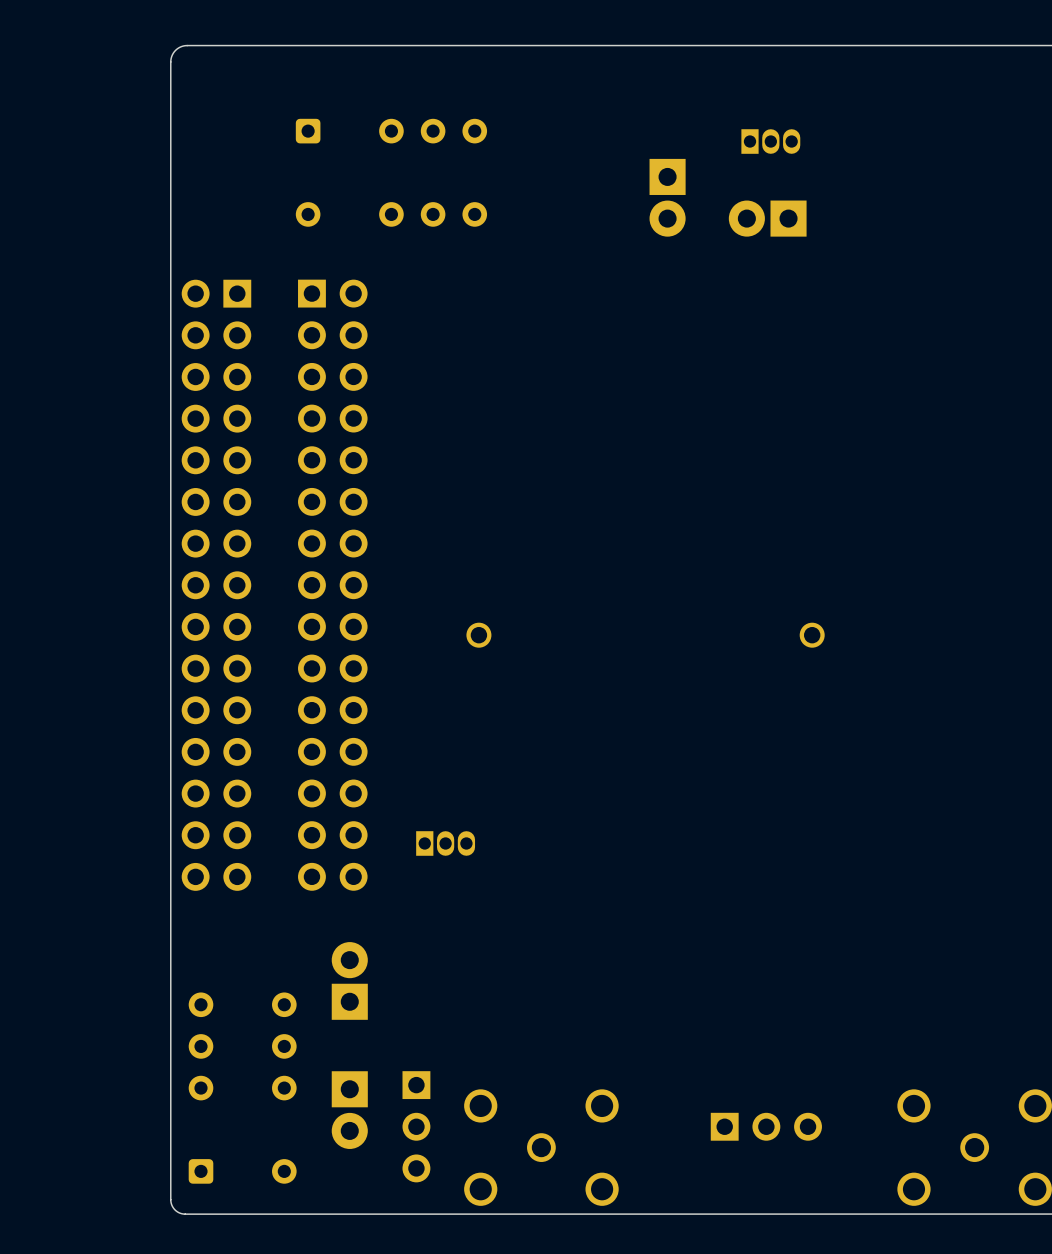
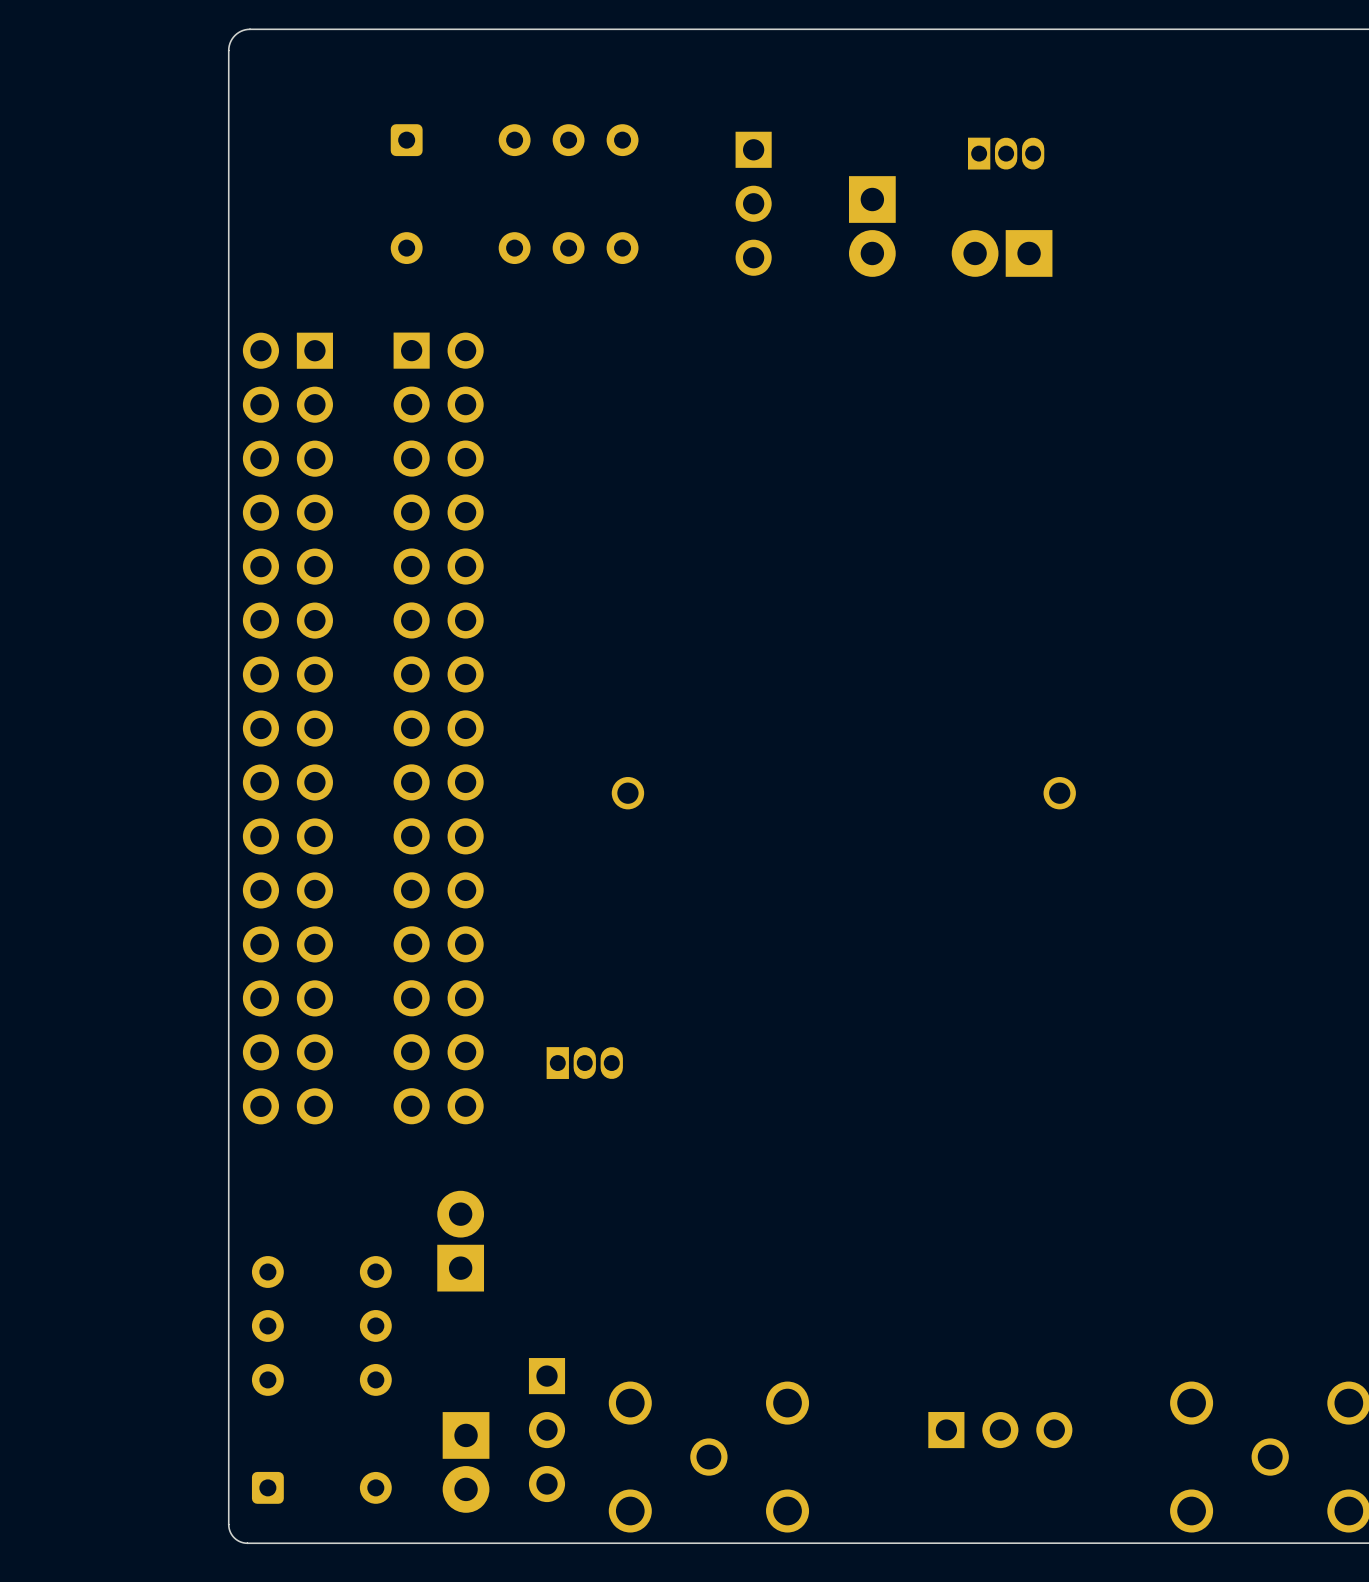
part: none -> (753, 203)
part position: (349, 1110) -> (466, 1462)

